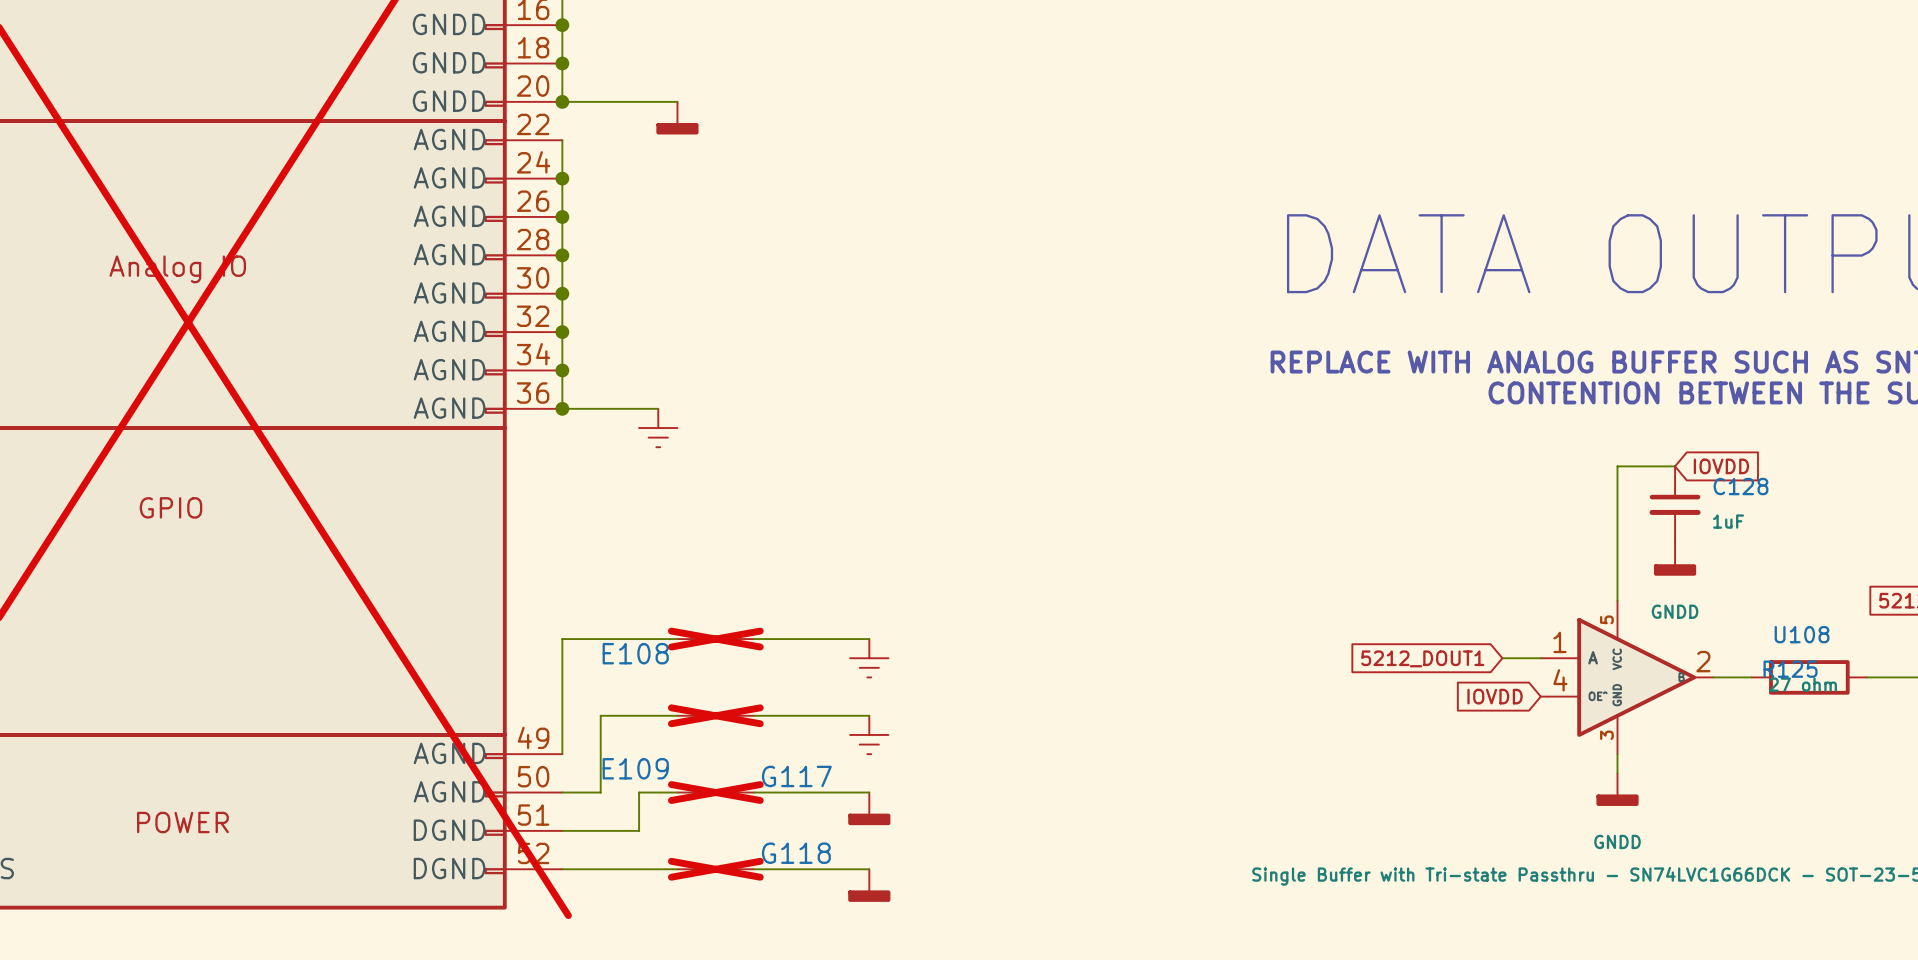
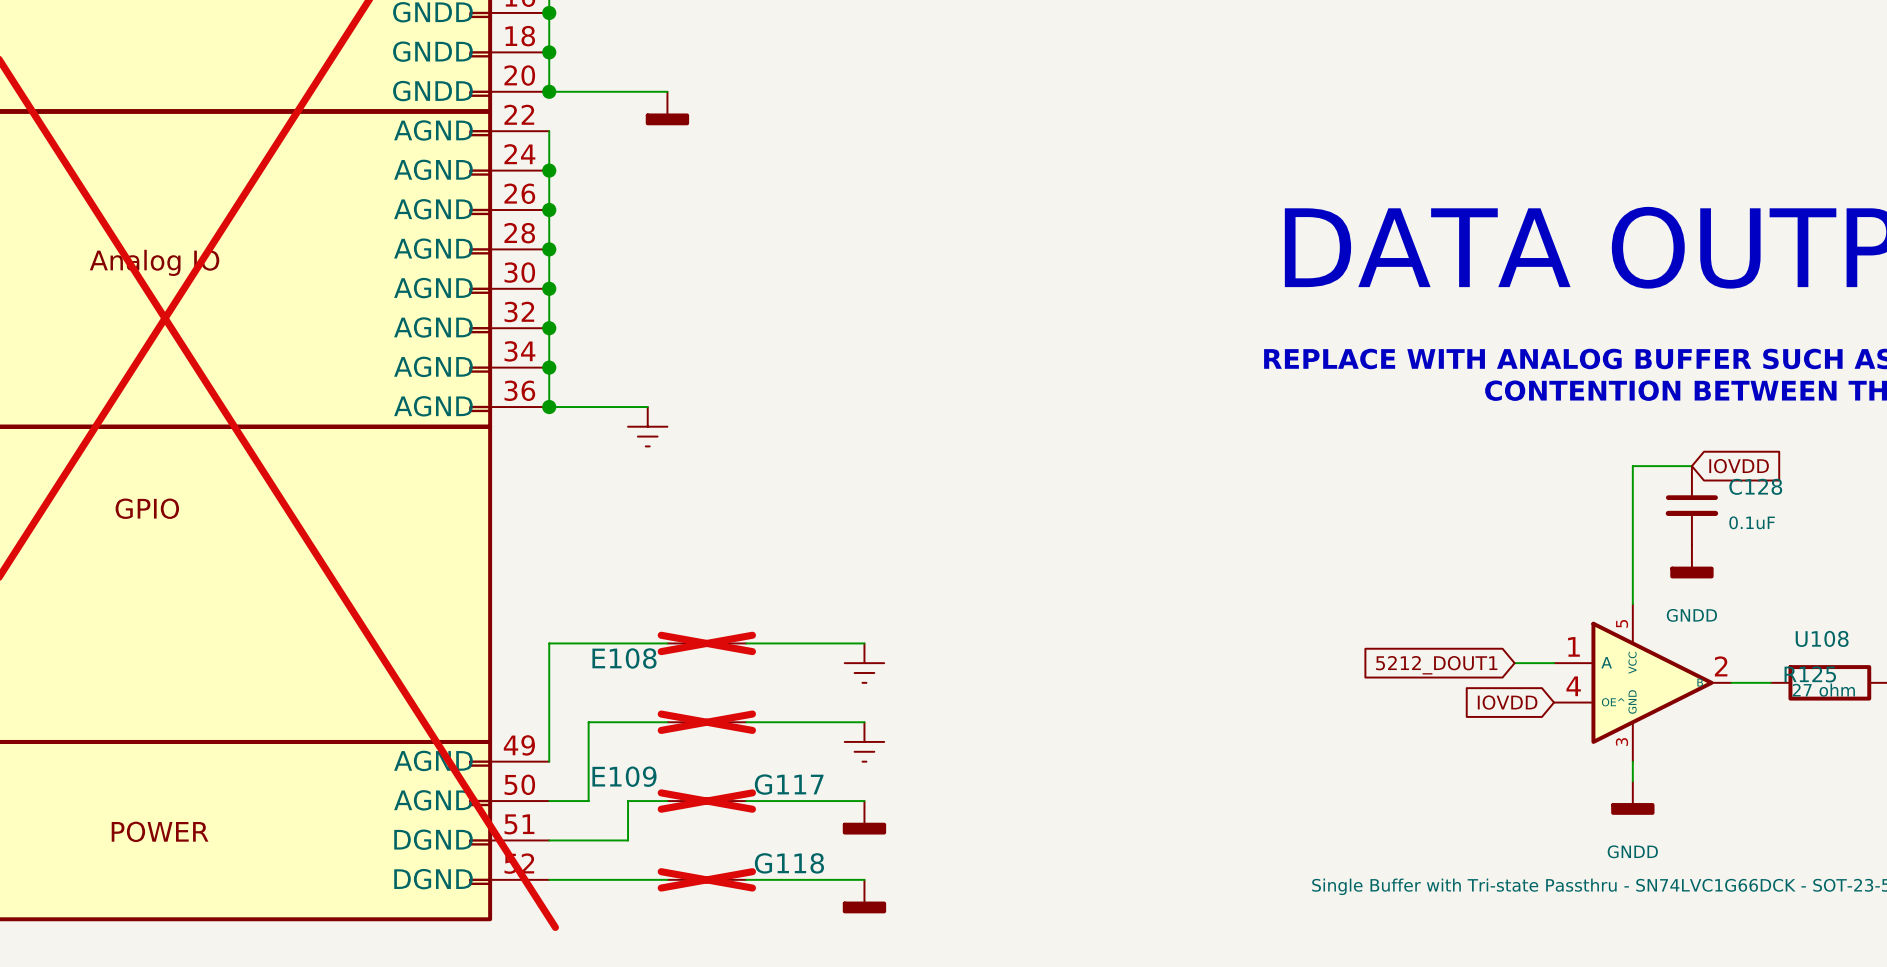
C128 value: 1uF (1728, 521) -> 0.1uF (1752, 522)

